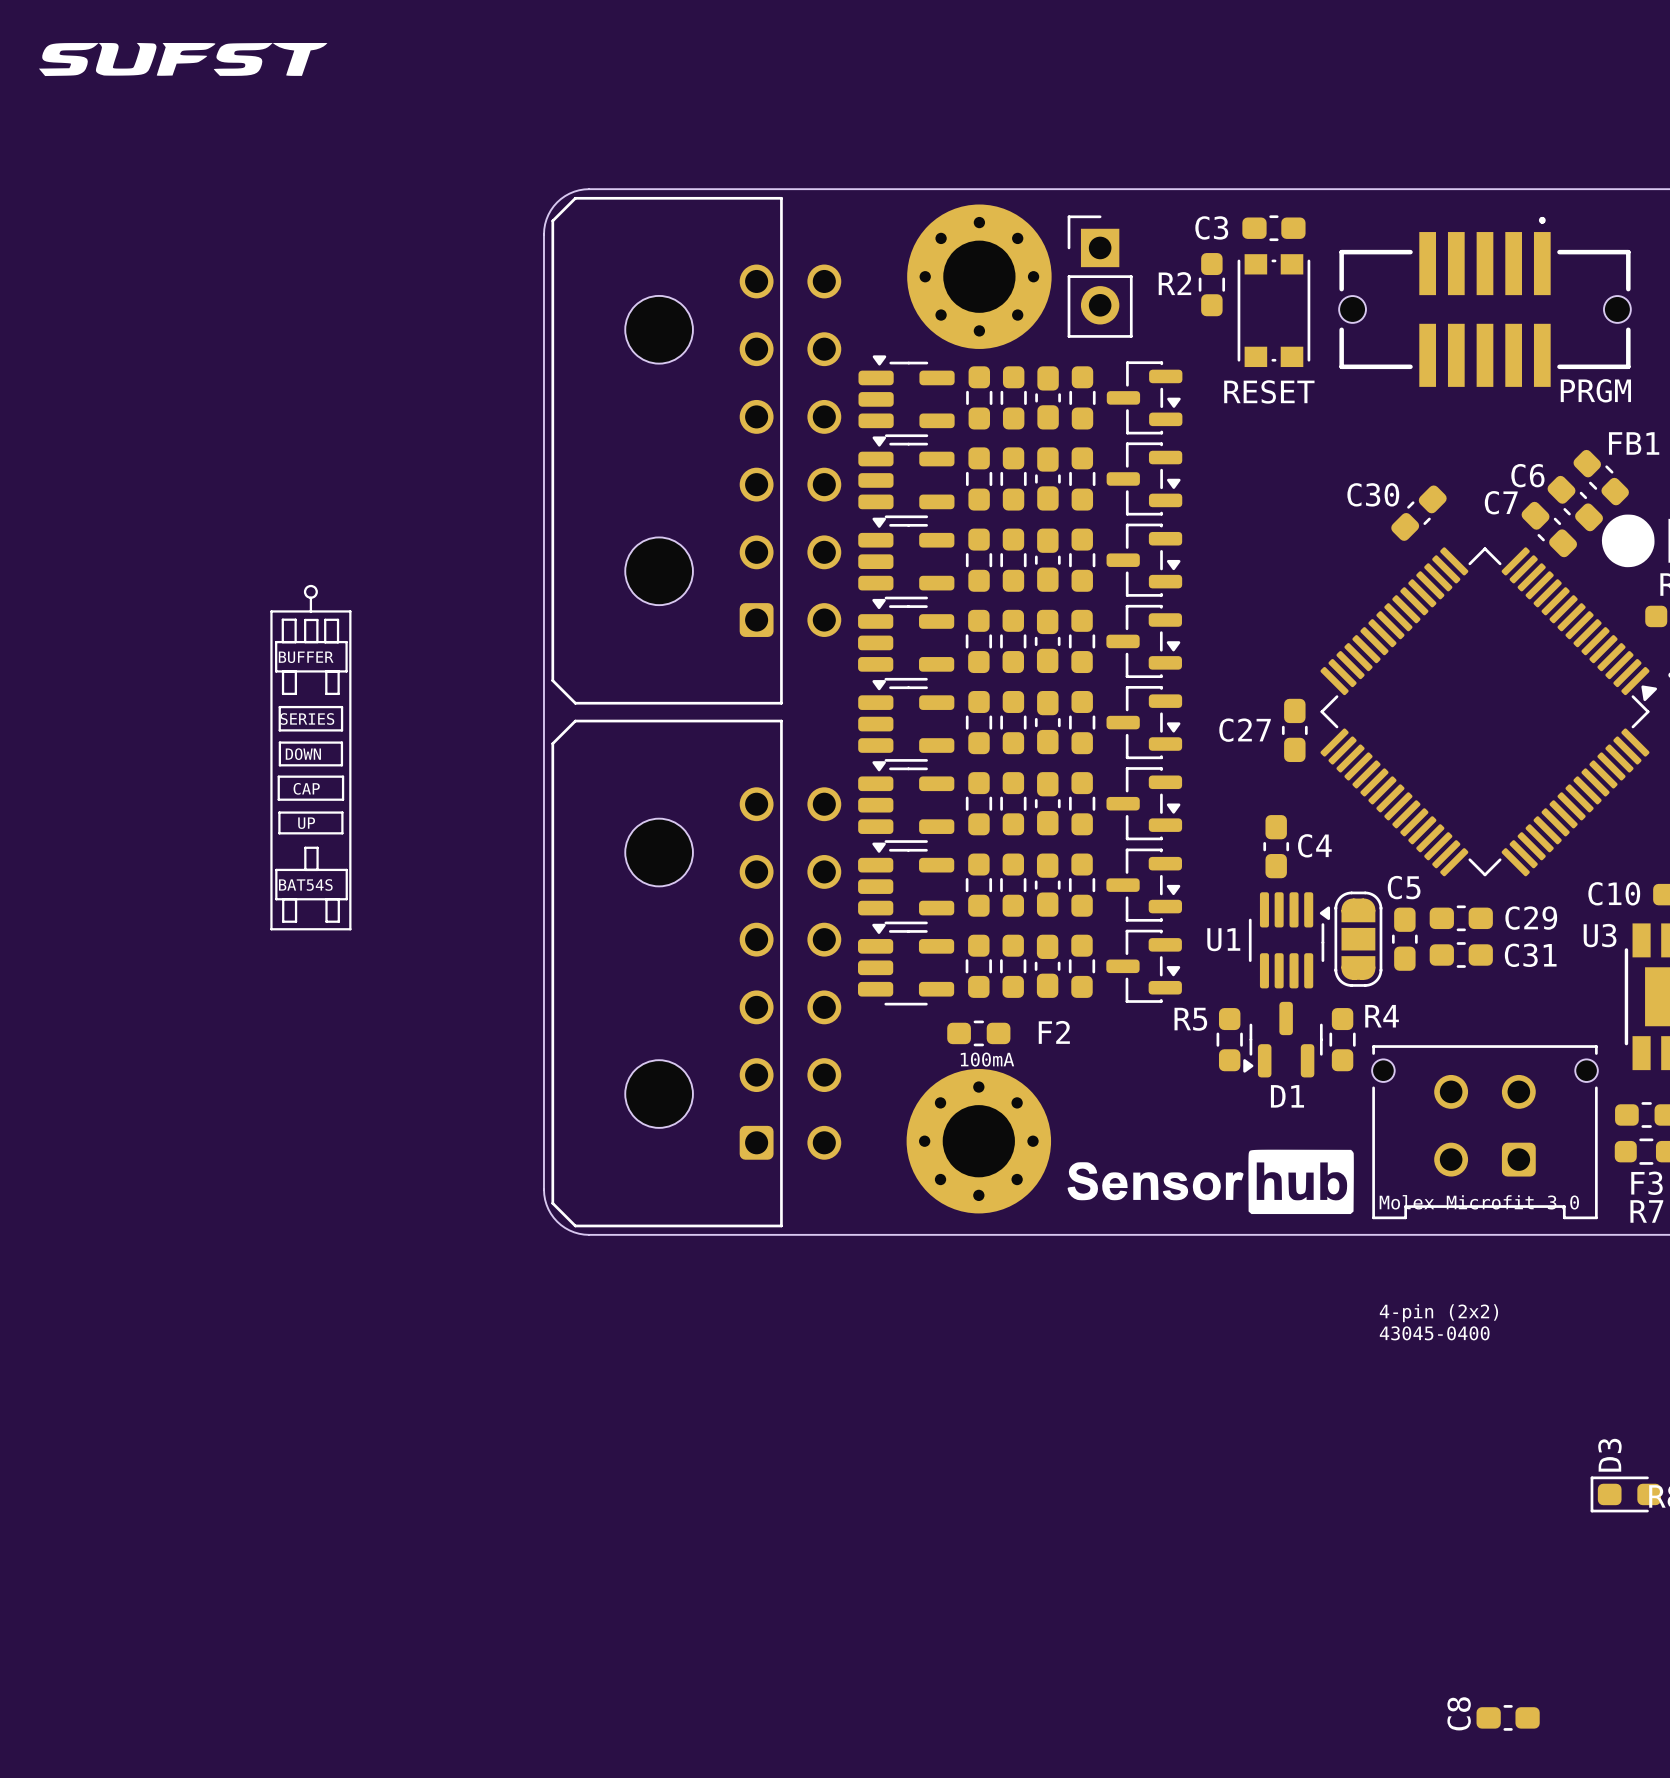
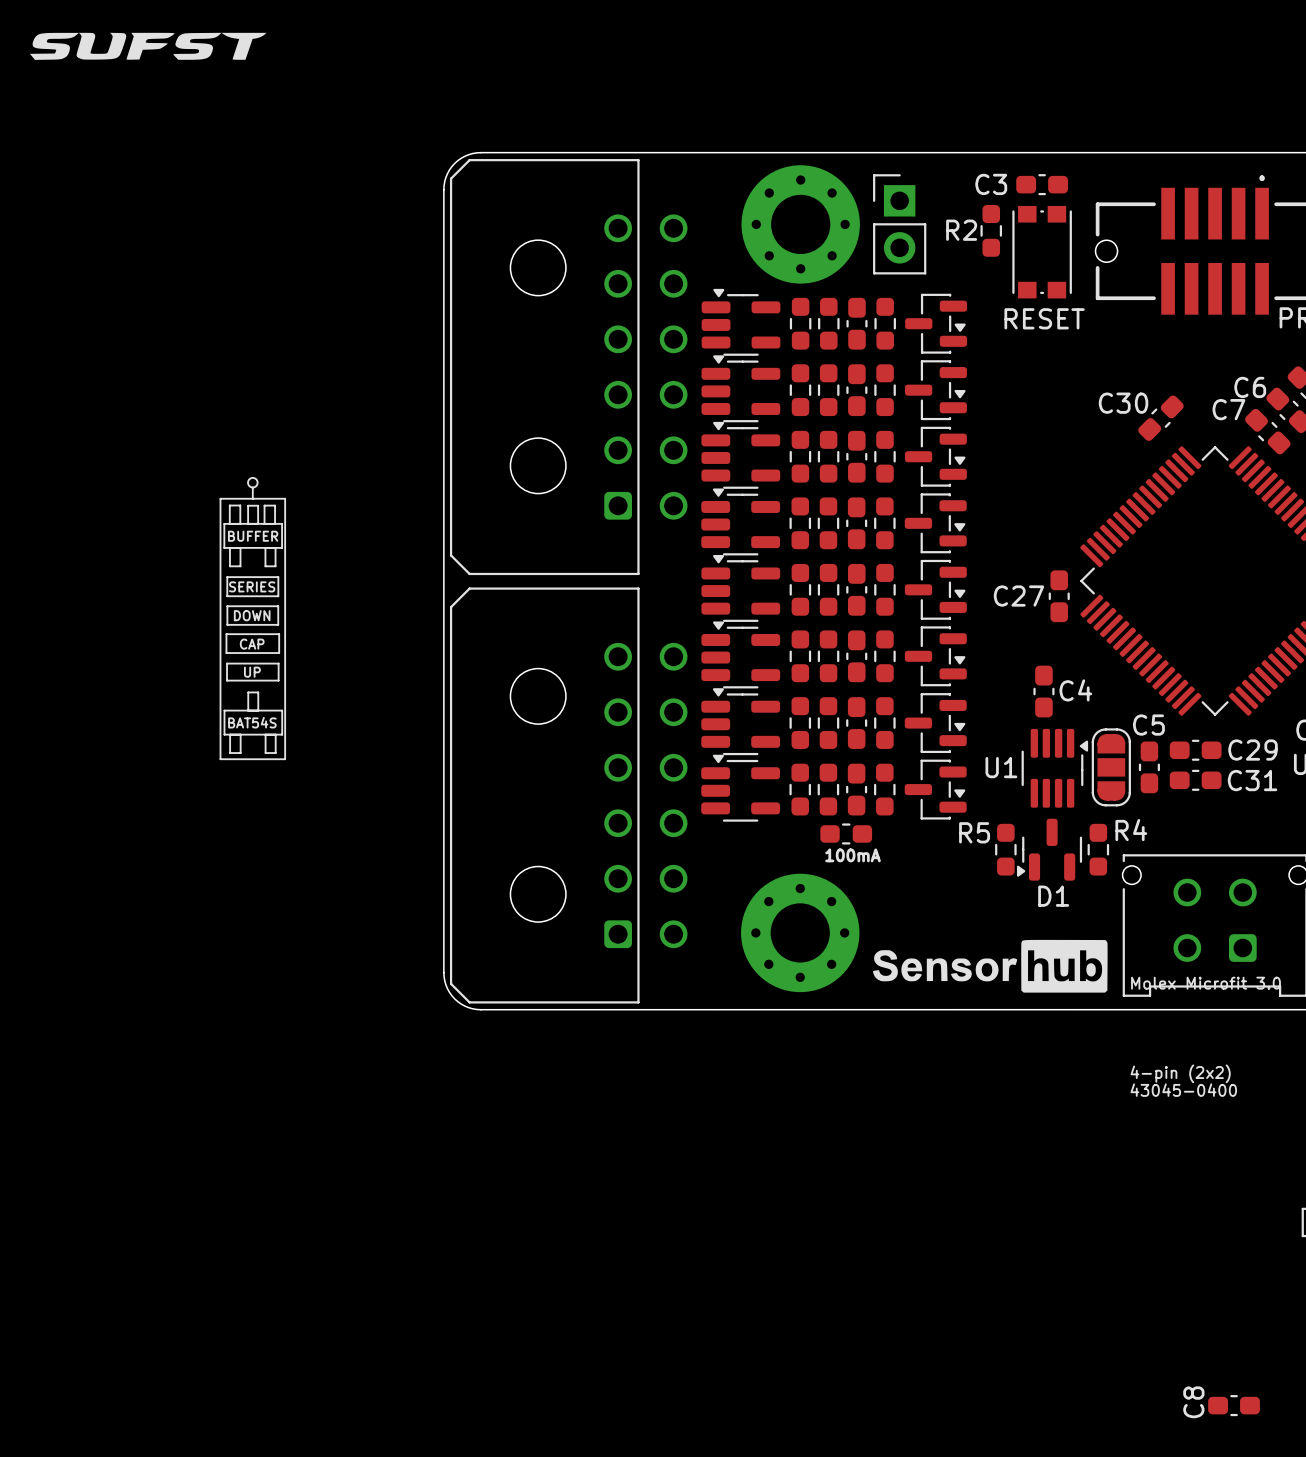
part: none -> 100mA (846, 833)
F2: 100mA (978, 1033) -> none

